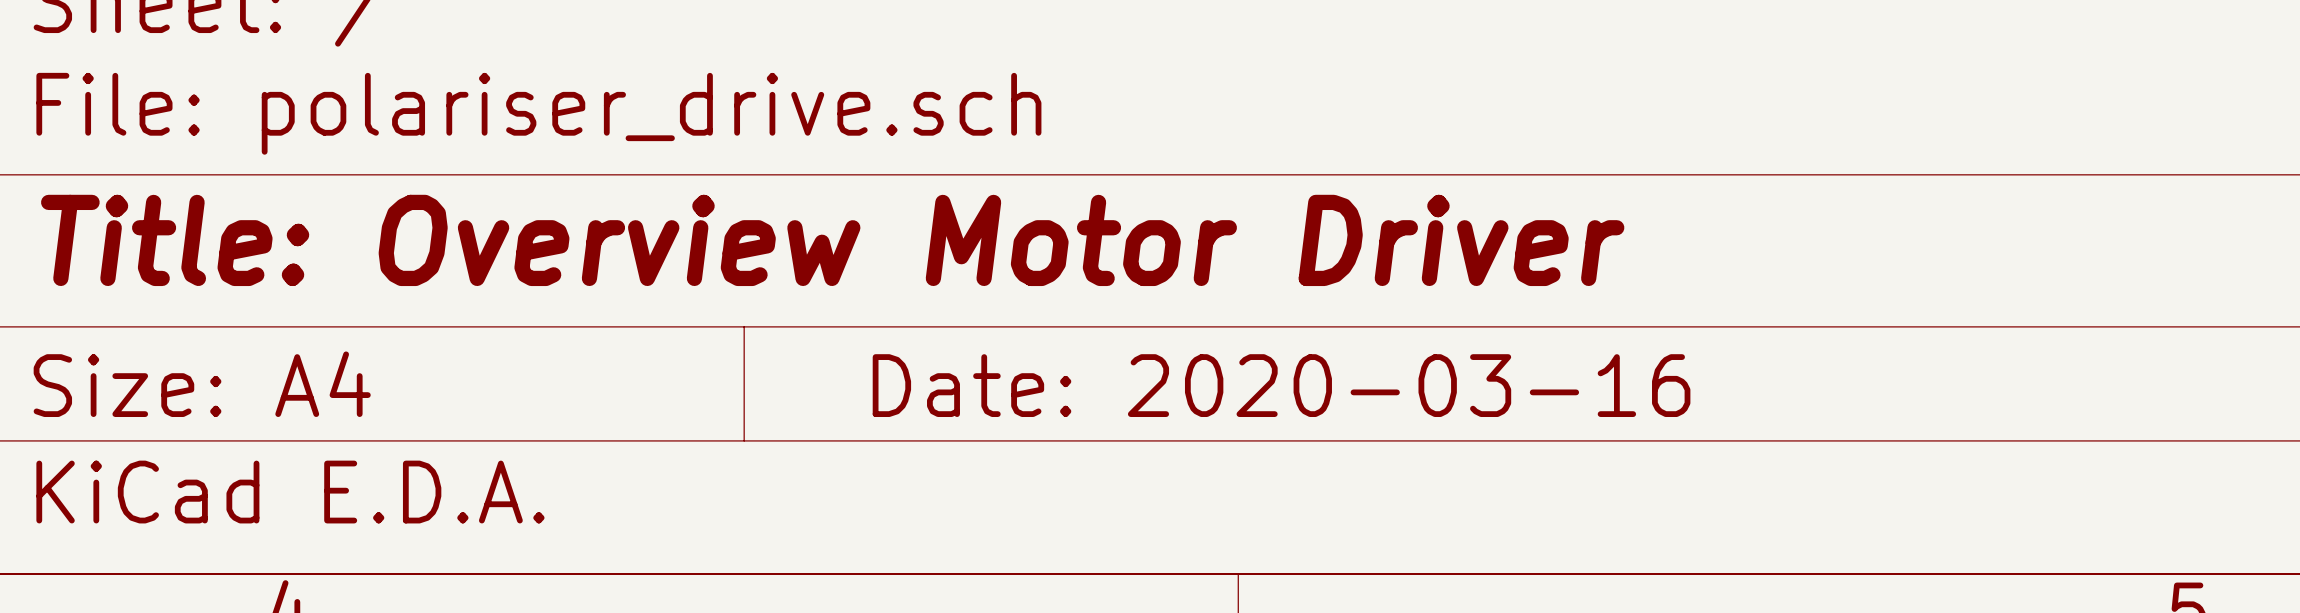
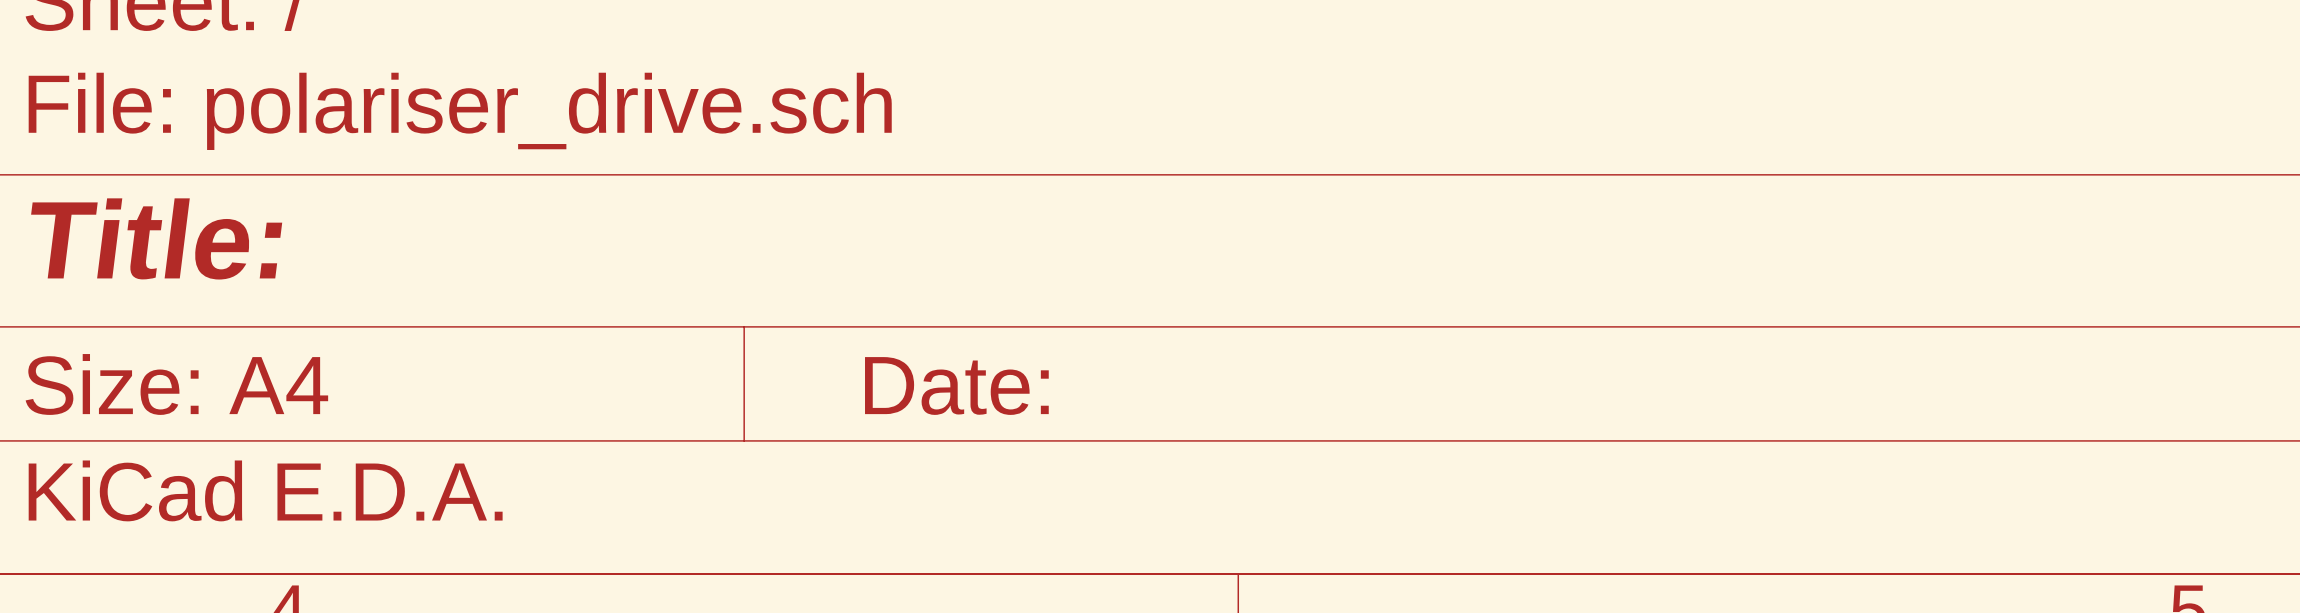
title block: Title: Overview Motor Driver (832, 240) -> Title: (156, 238)
title block: Date: 2020-03-16 (1281, 385) -> Date: (956, 386)

